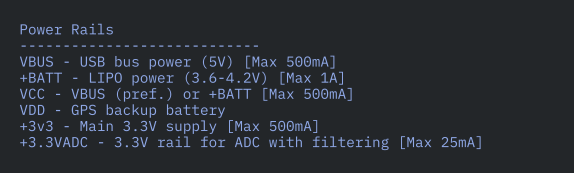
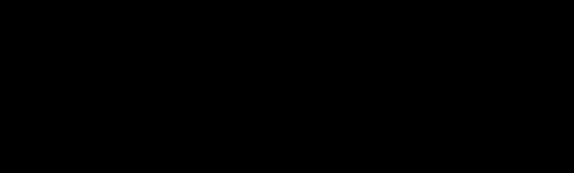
text: Power Rails (66, 29) -> none
text: ---------------------------- (139, 46) -> none
text: VBUS - USB bus power (5V) [Max 500mA] (177, 62) -> none
text: +BATT - LIPO power (3.6-4.2V) [Max 1A] (181, 78) -> none
text: VCC - VBUS (pref.) or +BATT [Max 500mA] (185, 94) -> none
text: VDD - GPS backup battery (122, 111) -> none
text: +3v3 - Main 3.3V supply [Max 500mA] (168, 126) -> none
text: +3.3VADC - 3.3V rail for ADC with filtering [Max 25mA] (250, 143) -> none

